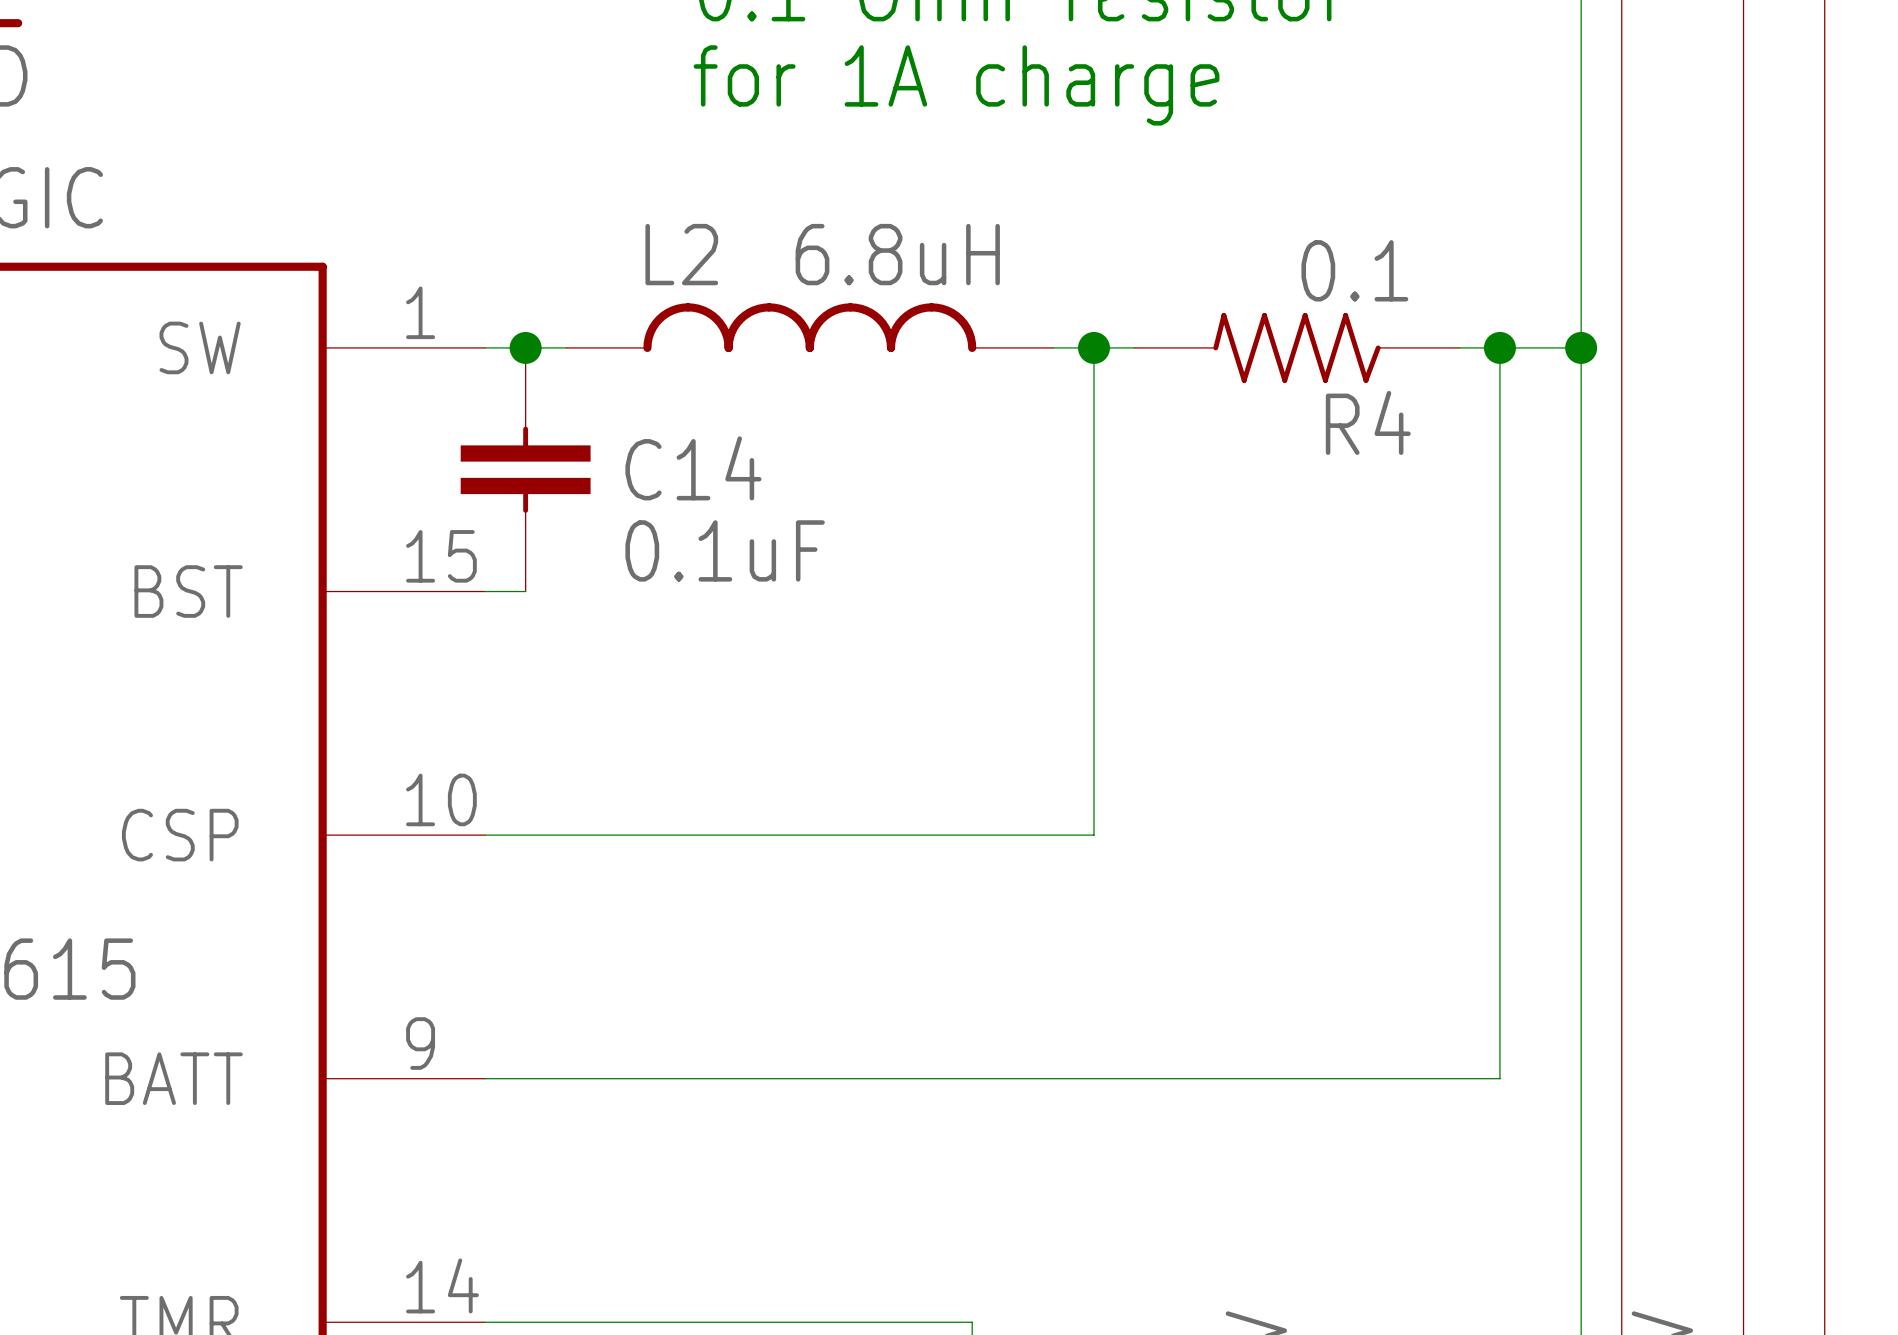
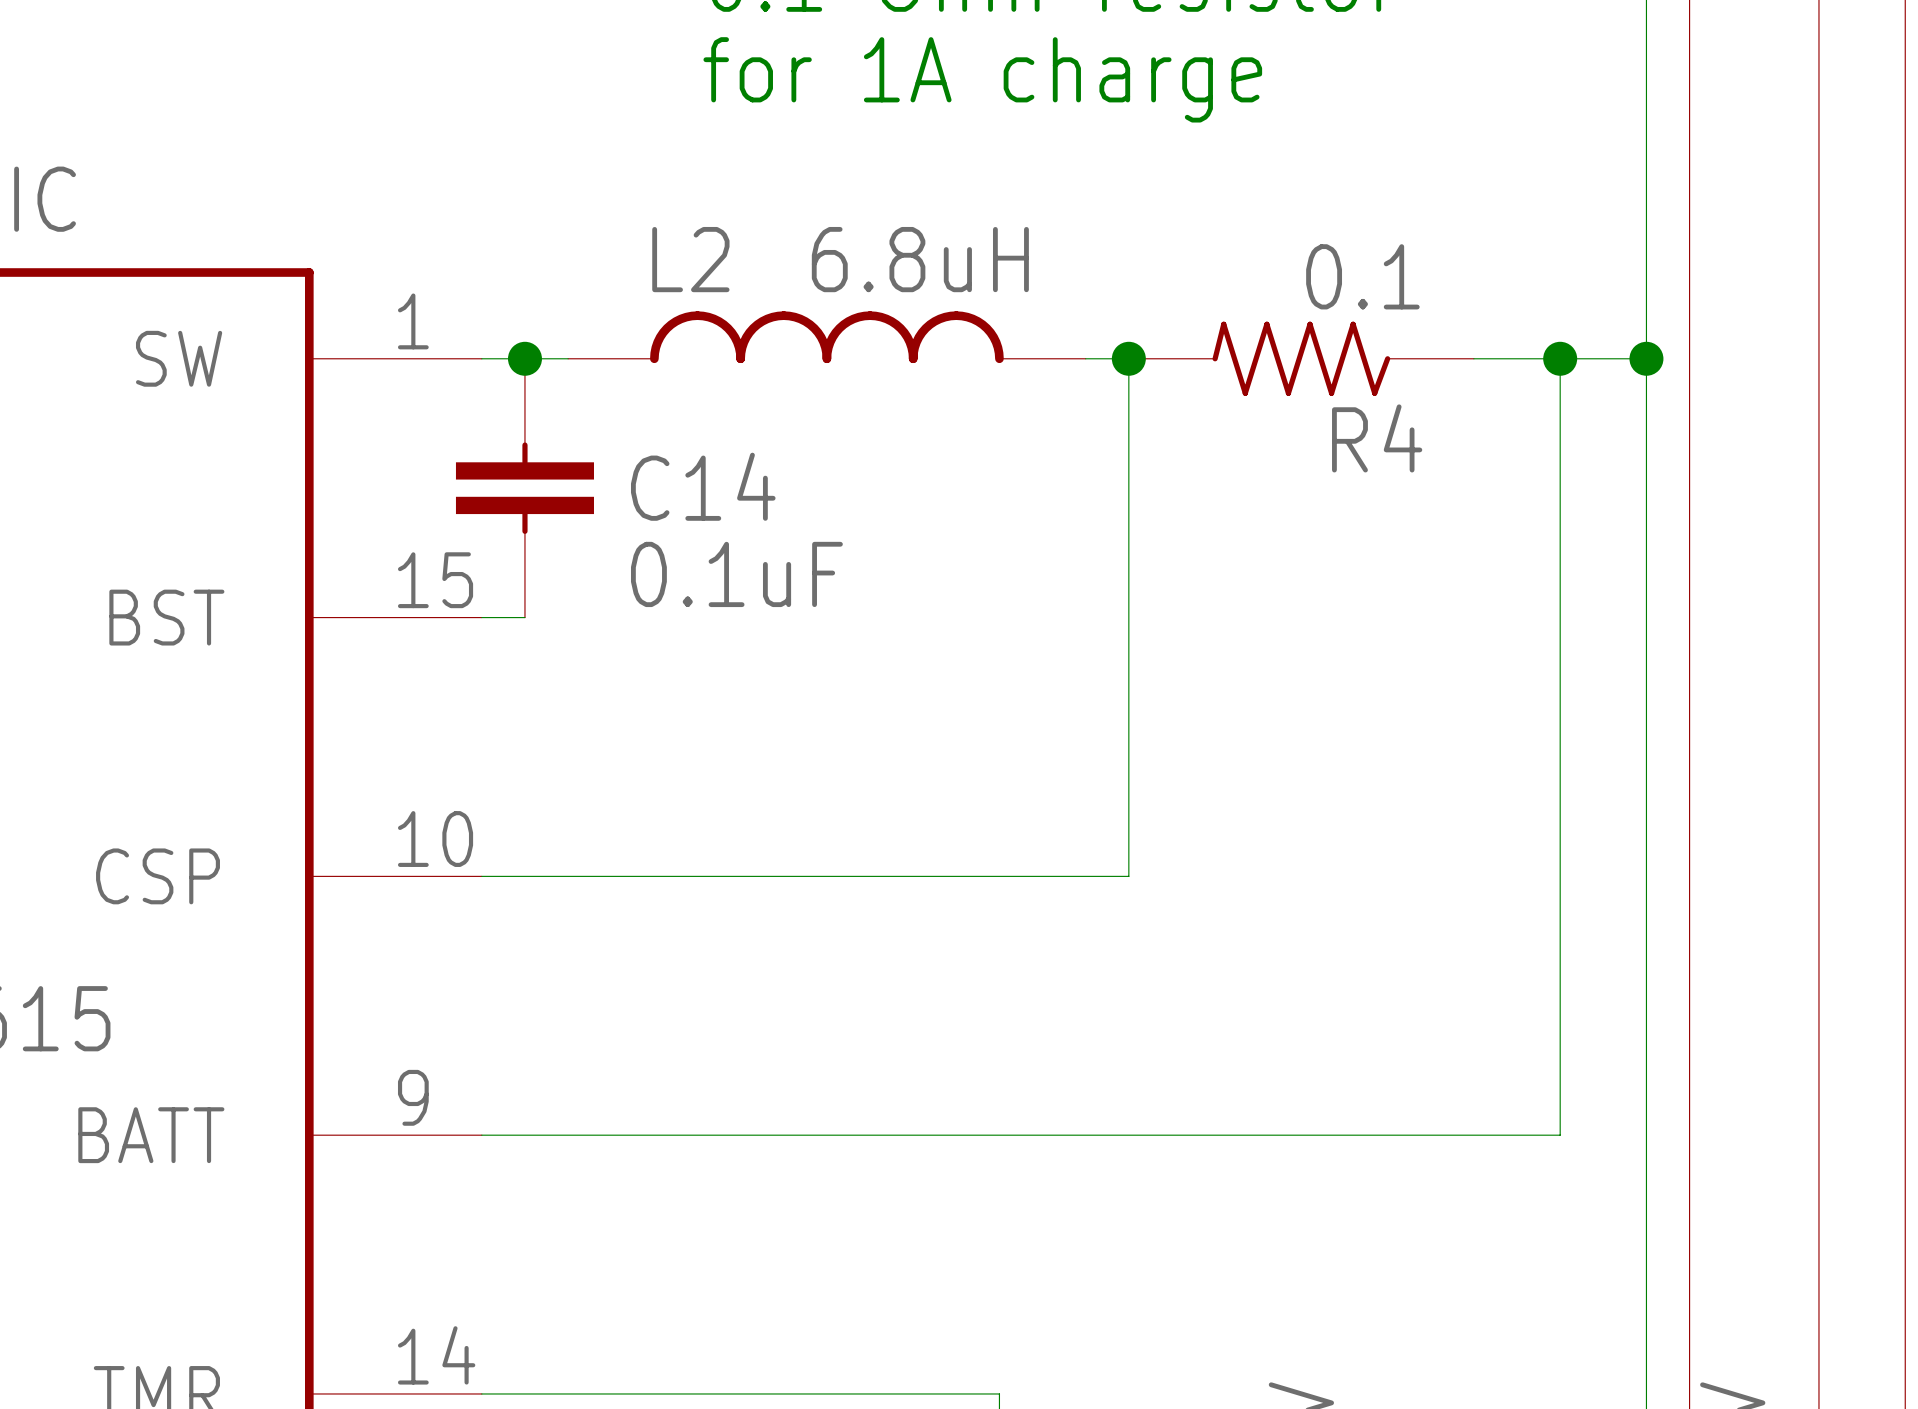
R4 position: (1296, 347) -> (1301, 358)

